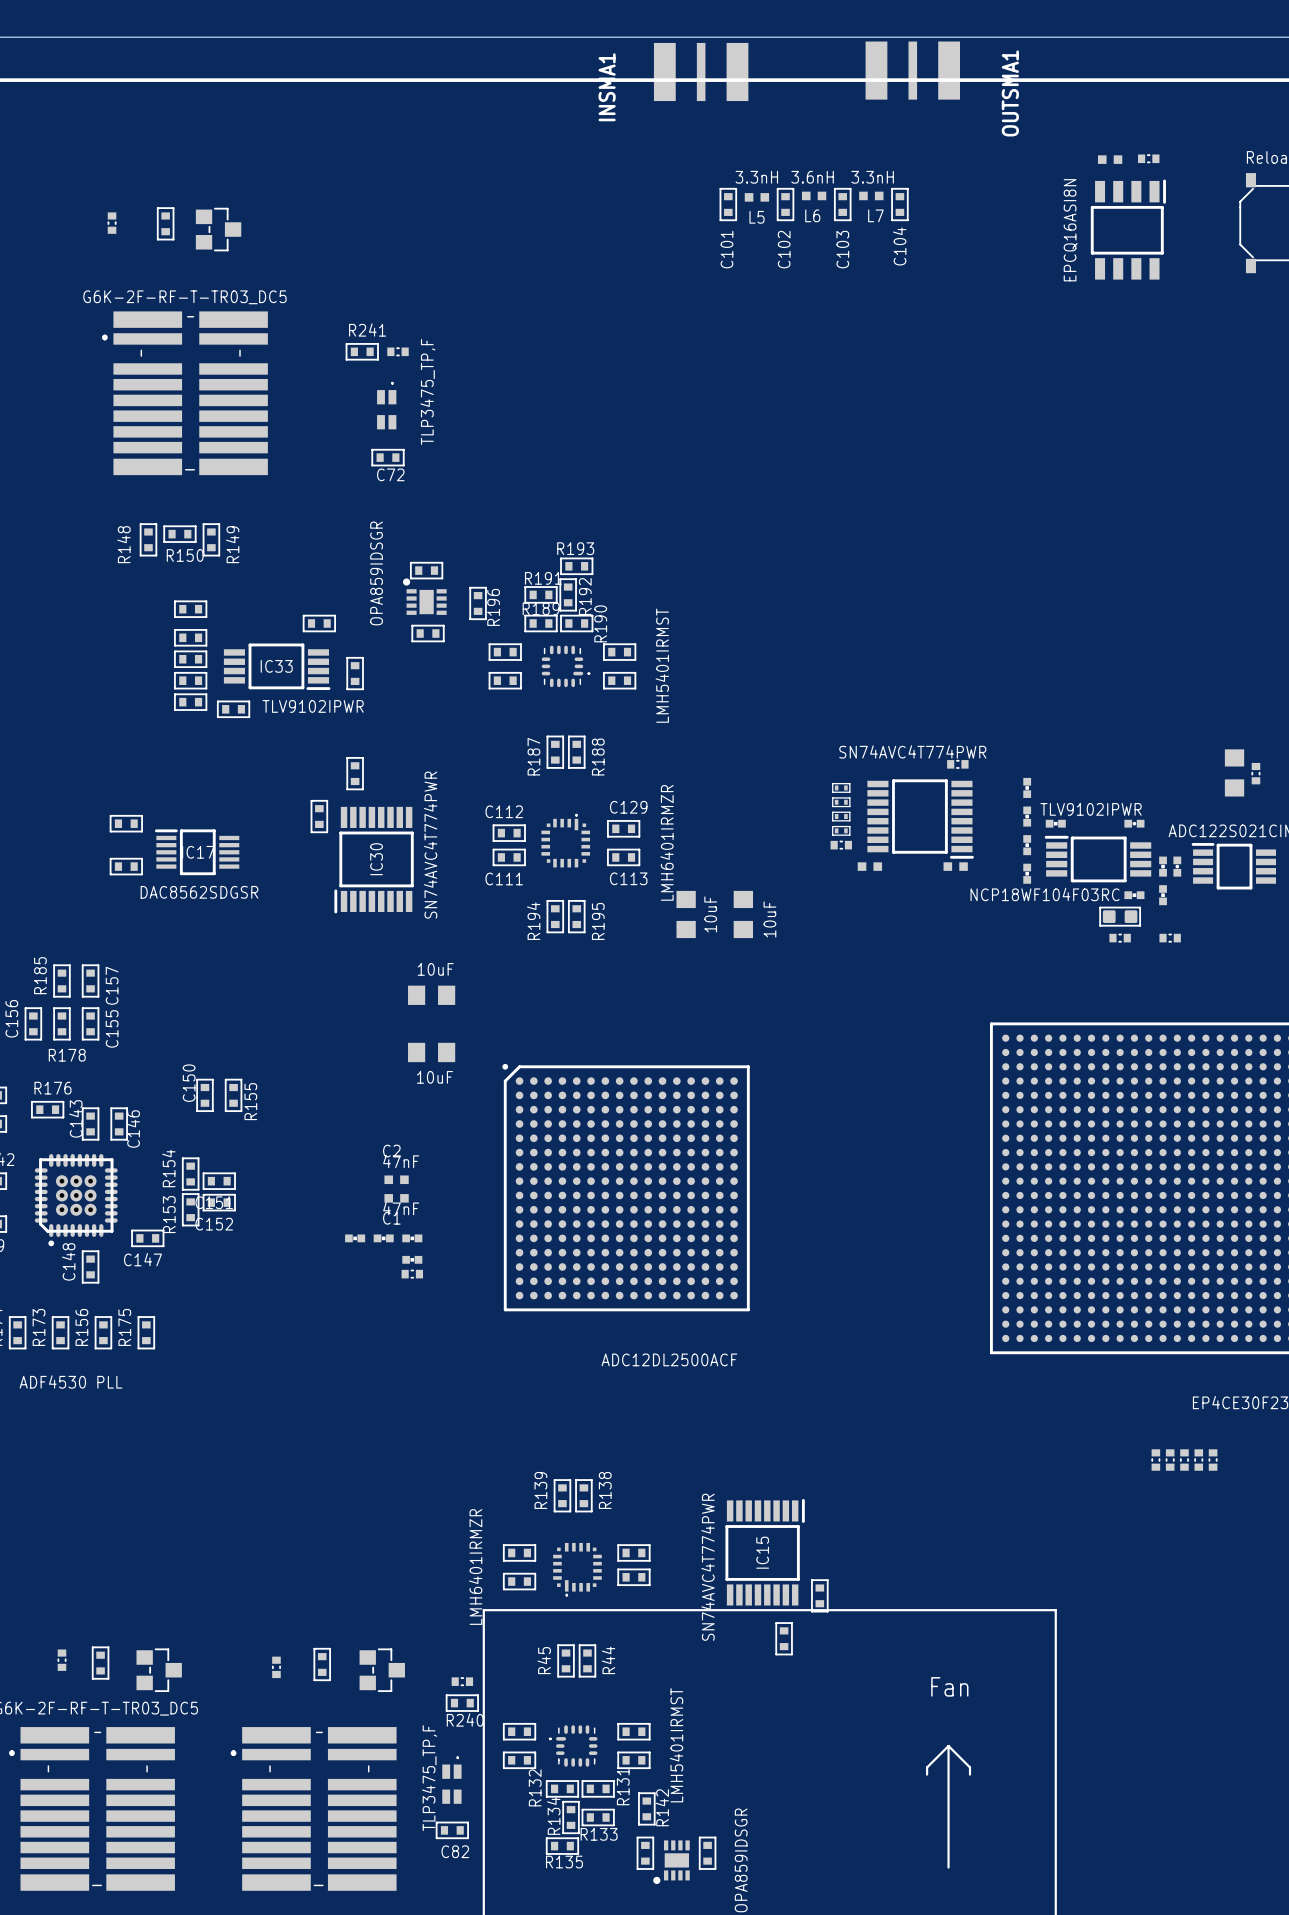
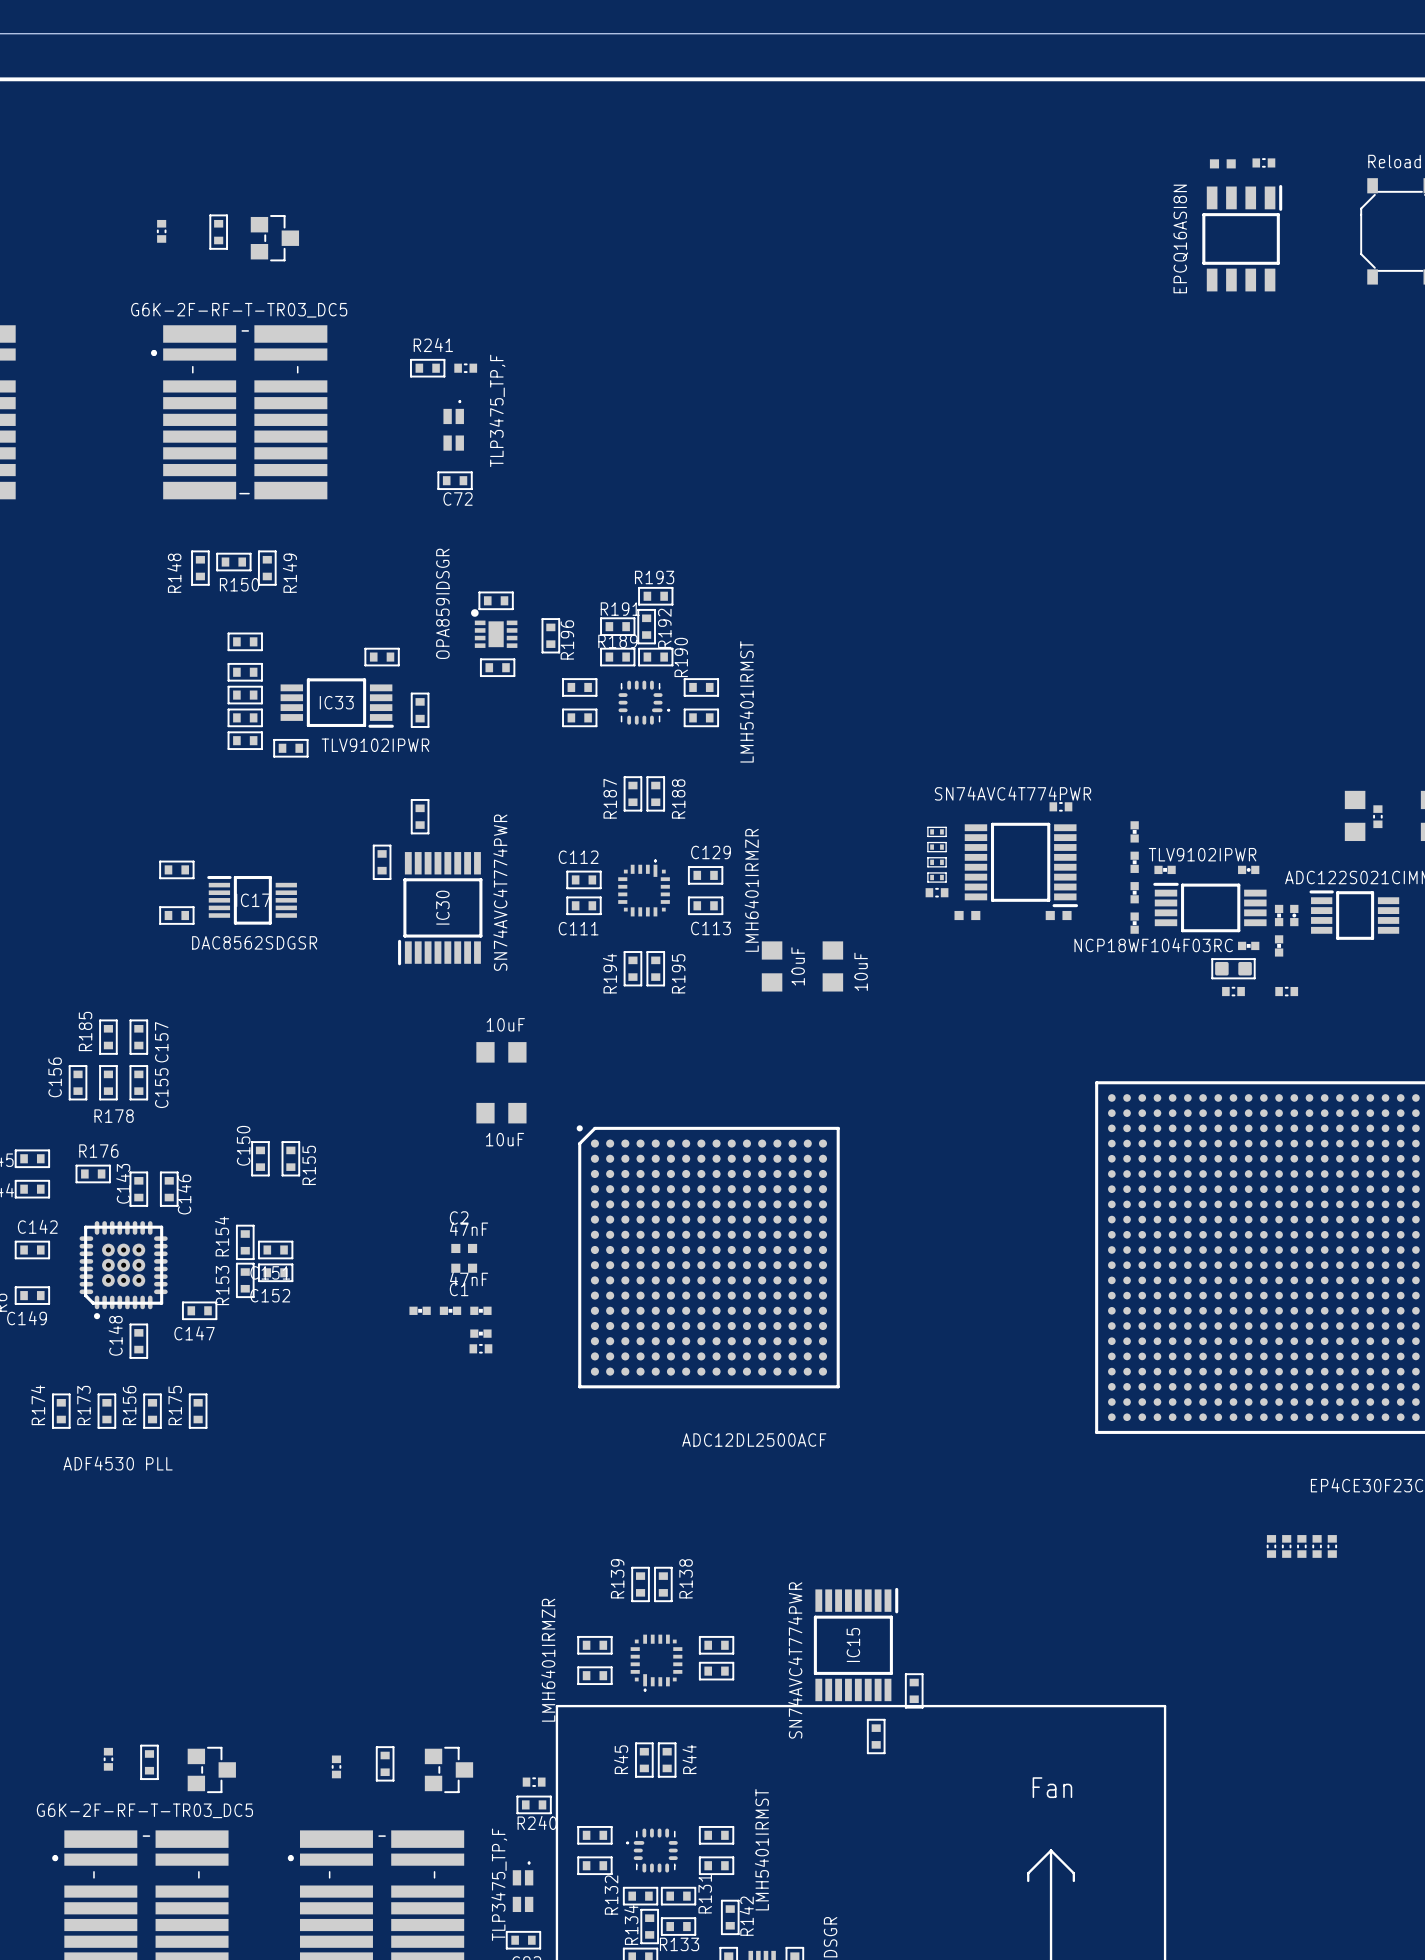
OUTSMA1: (912, 70) -> none
INSMA1: (701, 72) -> none
L6: 3.6nH (814, 195) -> none
L7: 3.3nH (871, 195) -> none
L5: 3.3nH (756, 197) -> none
C101: (728, 204) -> none
C102: (785, 204) -> none
C103: (842, 204) -> none
C104: (899, 204) -> none

